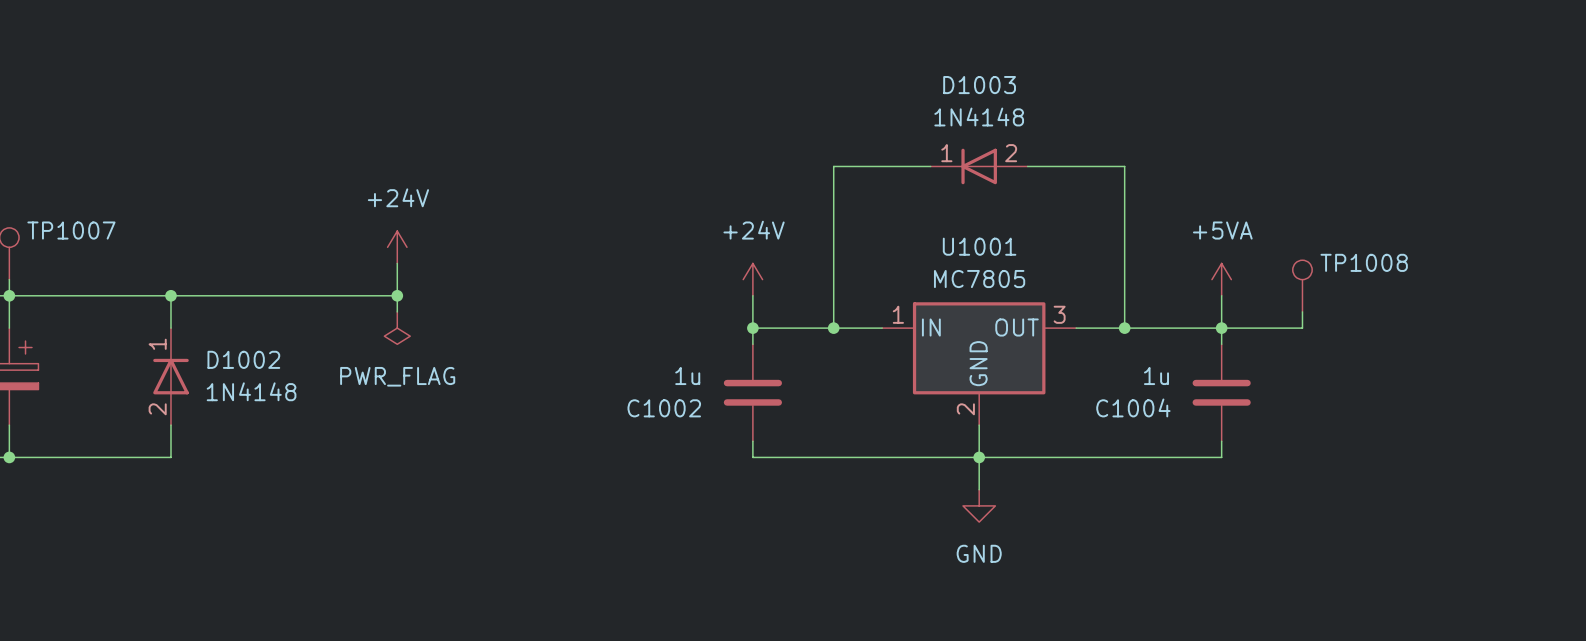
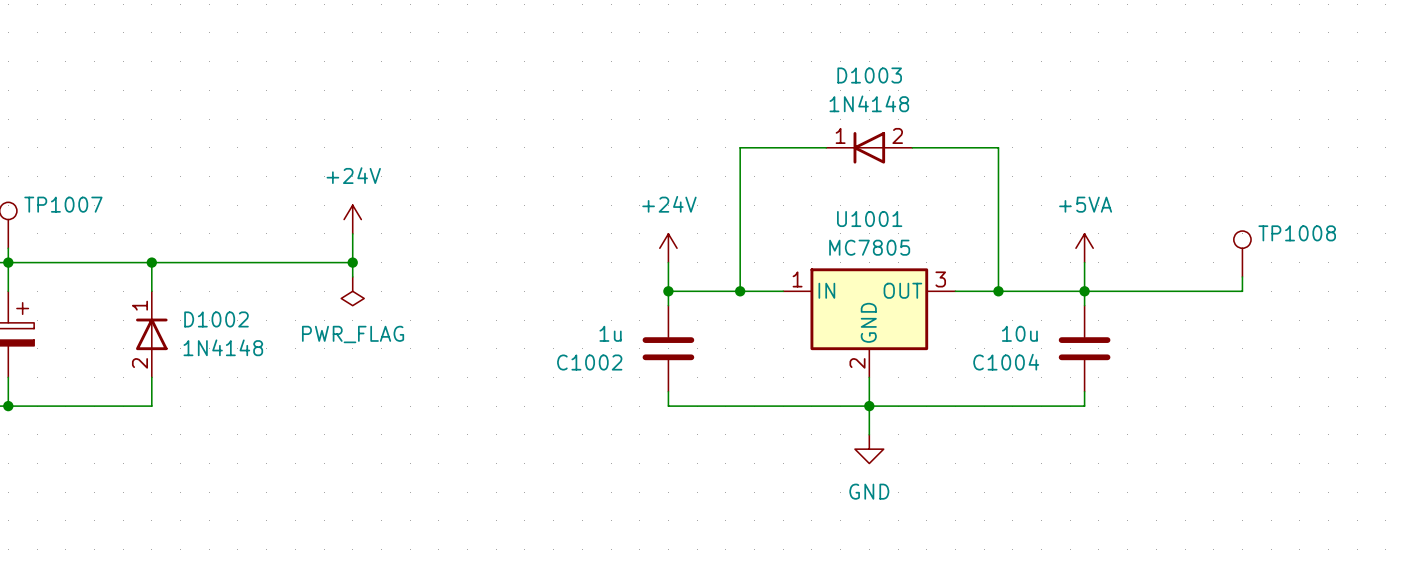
TP1008 position: (1302, 286) -> (1242, 253)
wire: (1302, 311) (1302, 328) -> (1242, 276) (1242, 291) (1156, 291)
C1004 value: 1u (1156, 376) -> 10u (1019, 333)

